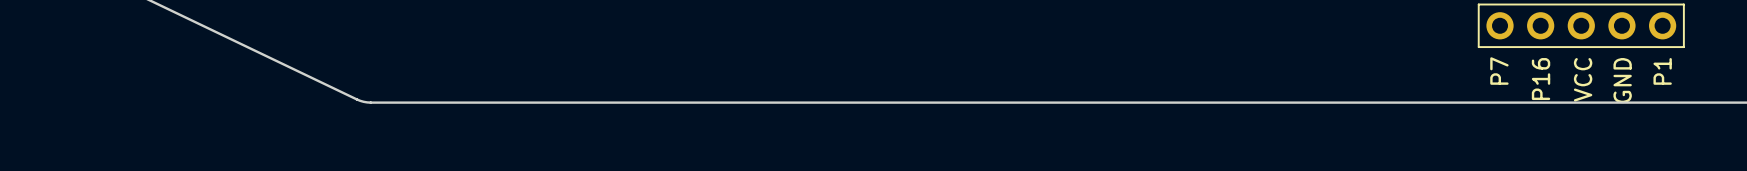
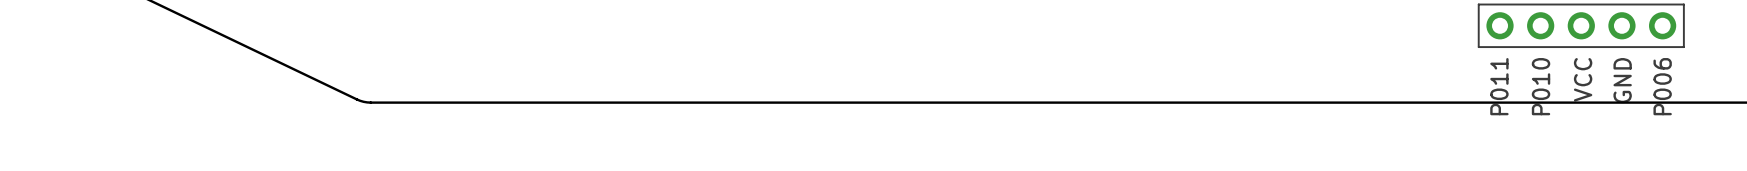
part text: P7 (1499, 71) -> P011 (1499, 86)
part text: P1 (1662, 71) -> P006 (1662, 86)
part text: P16 (1541, 79) -> P010 (1541, 86)

